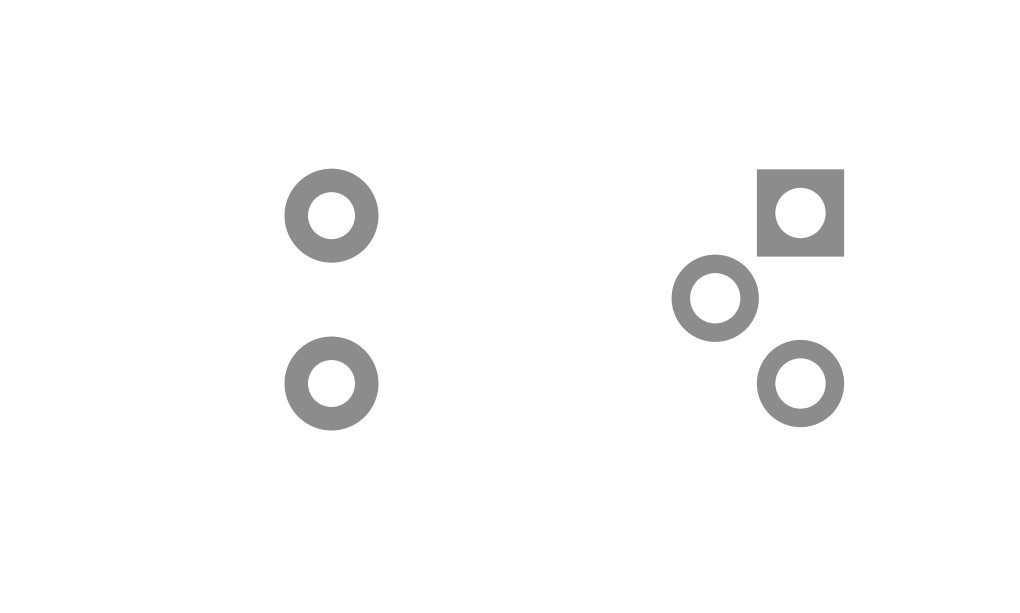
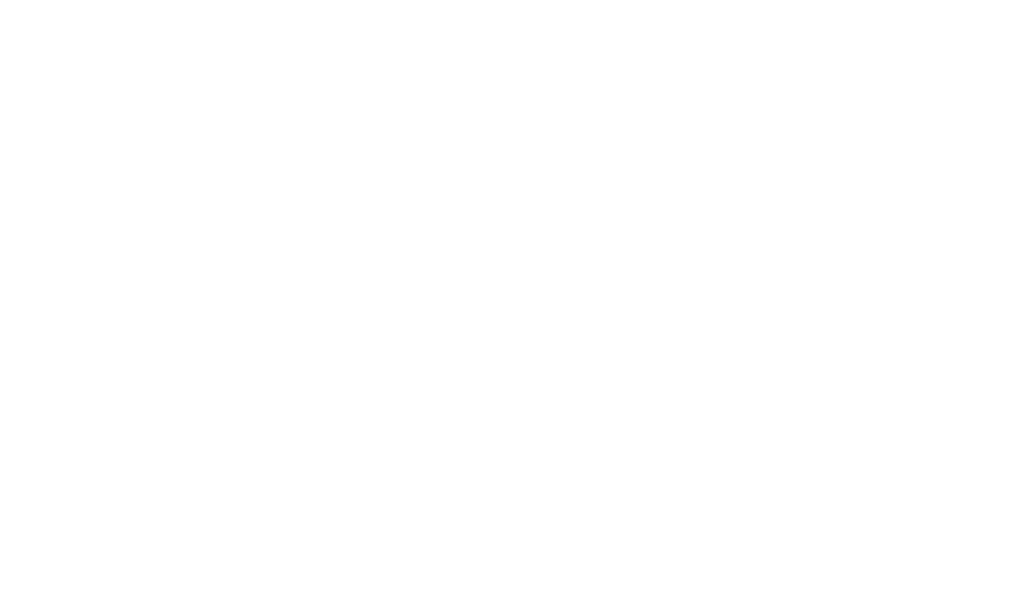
part: (757, 298) -> none
part: (331, 299) -> none

